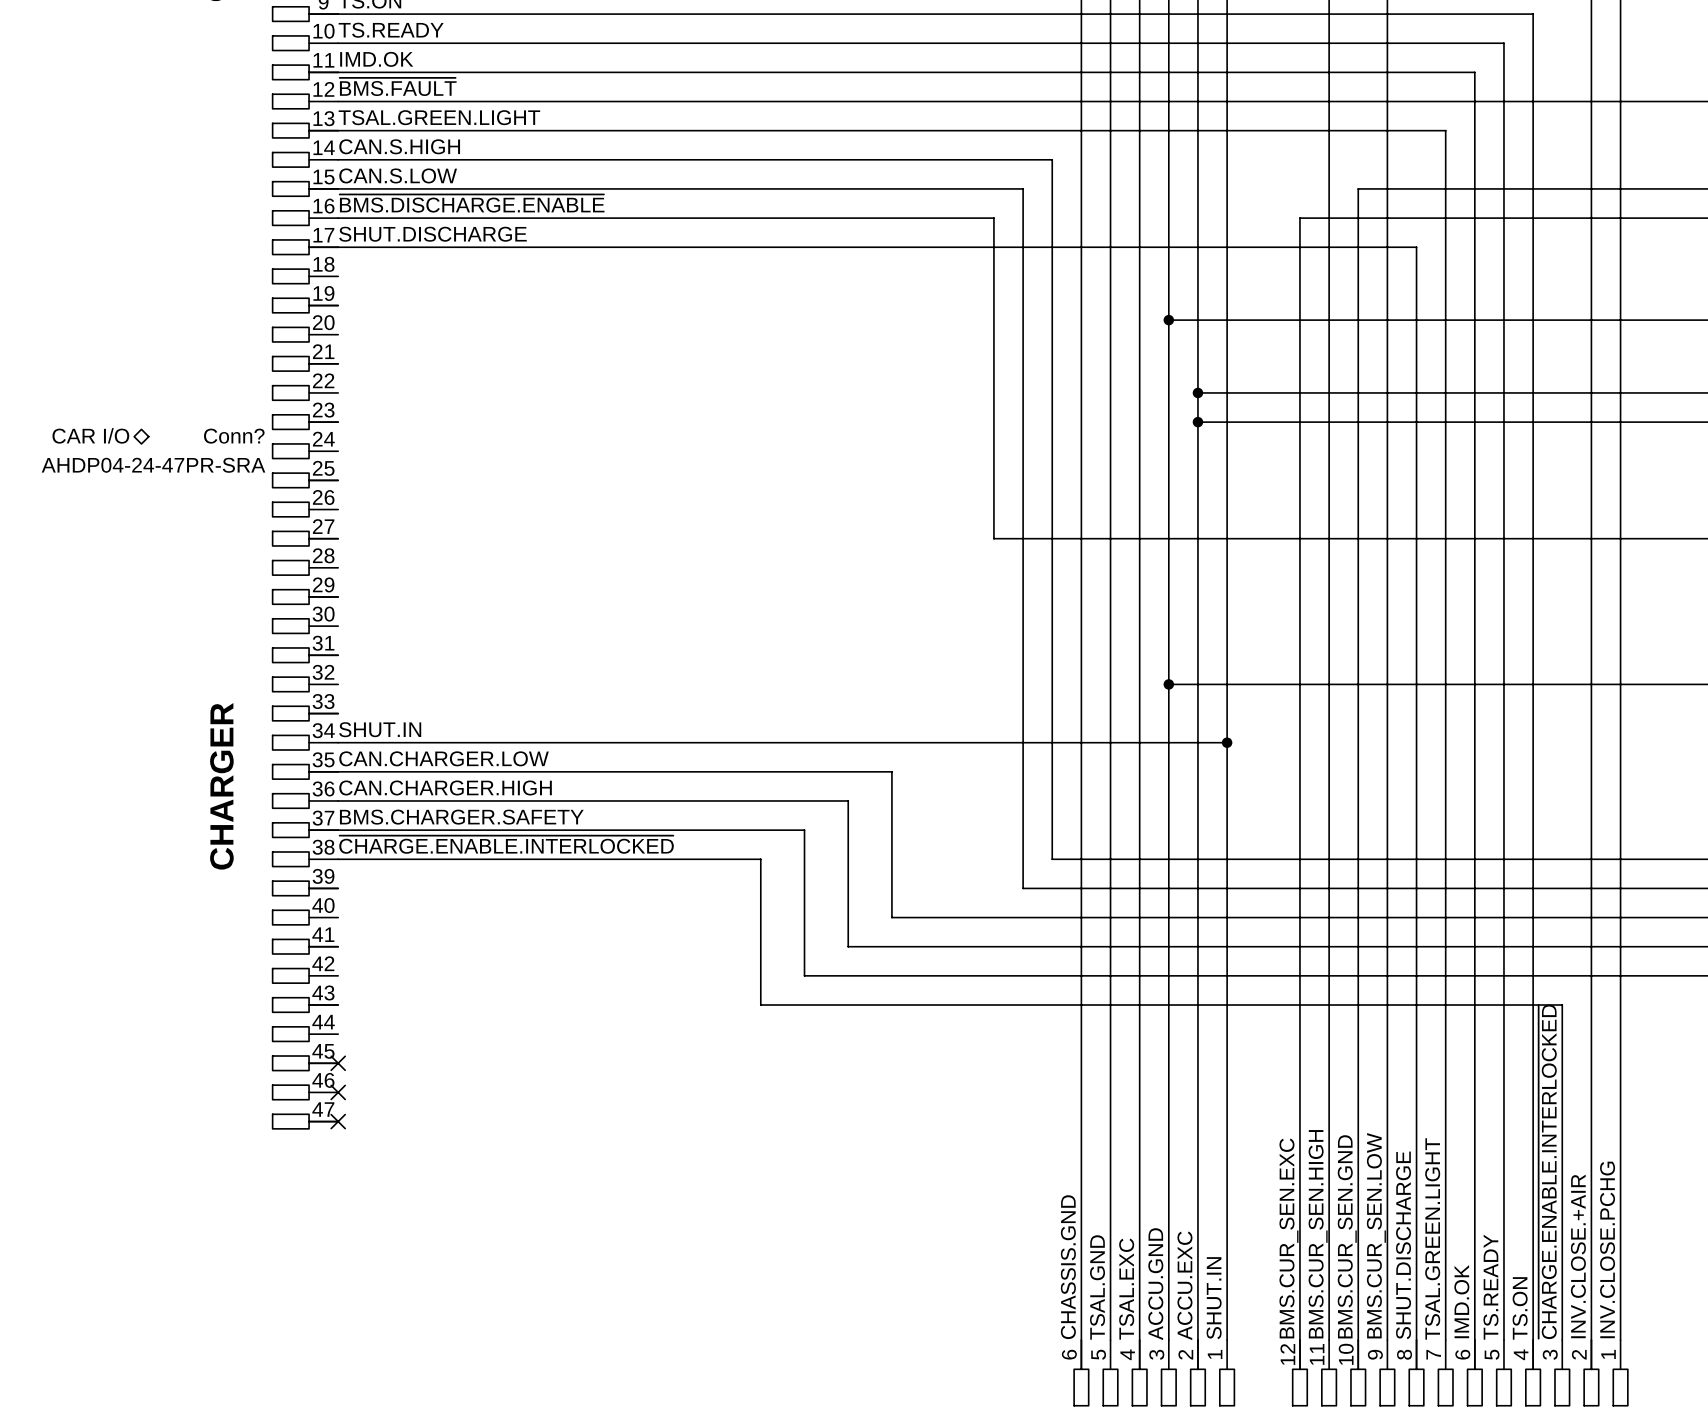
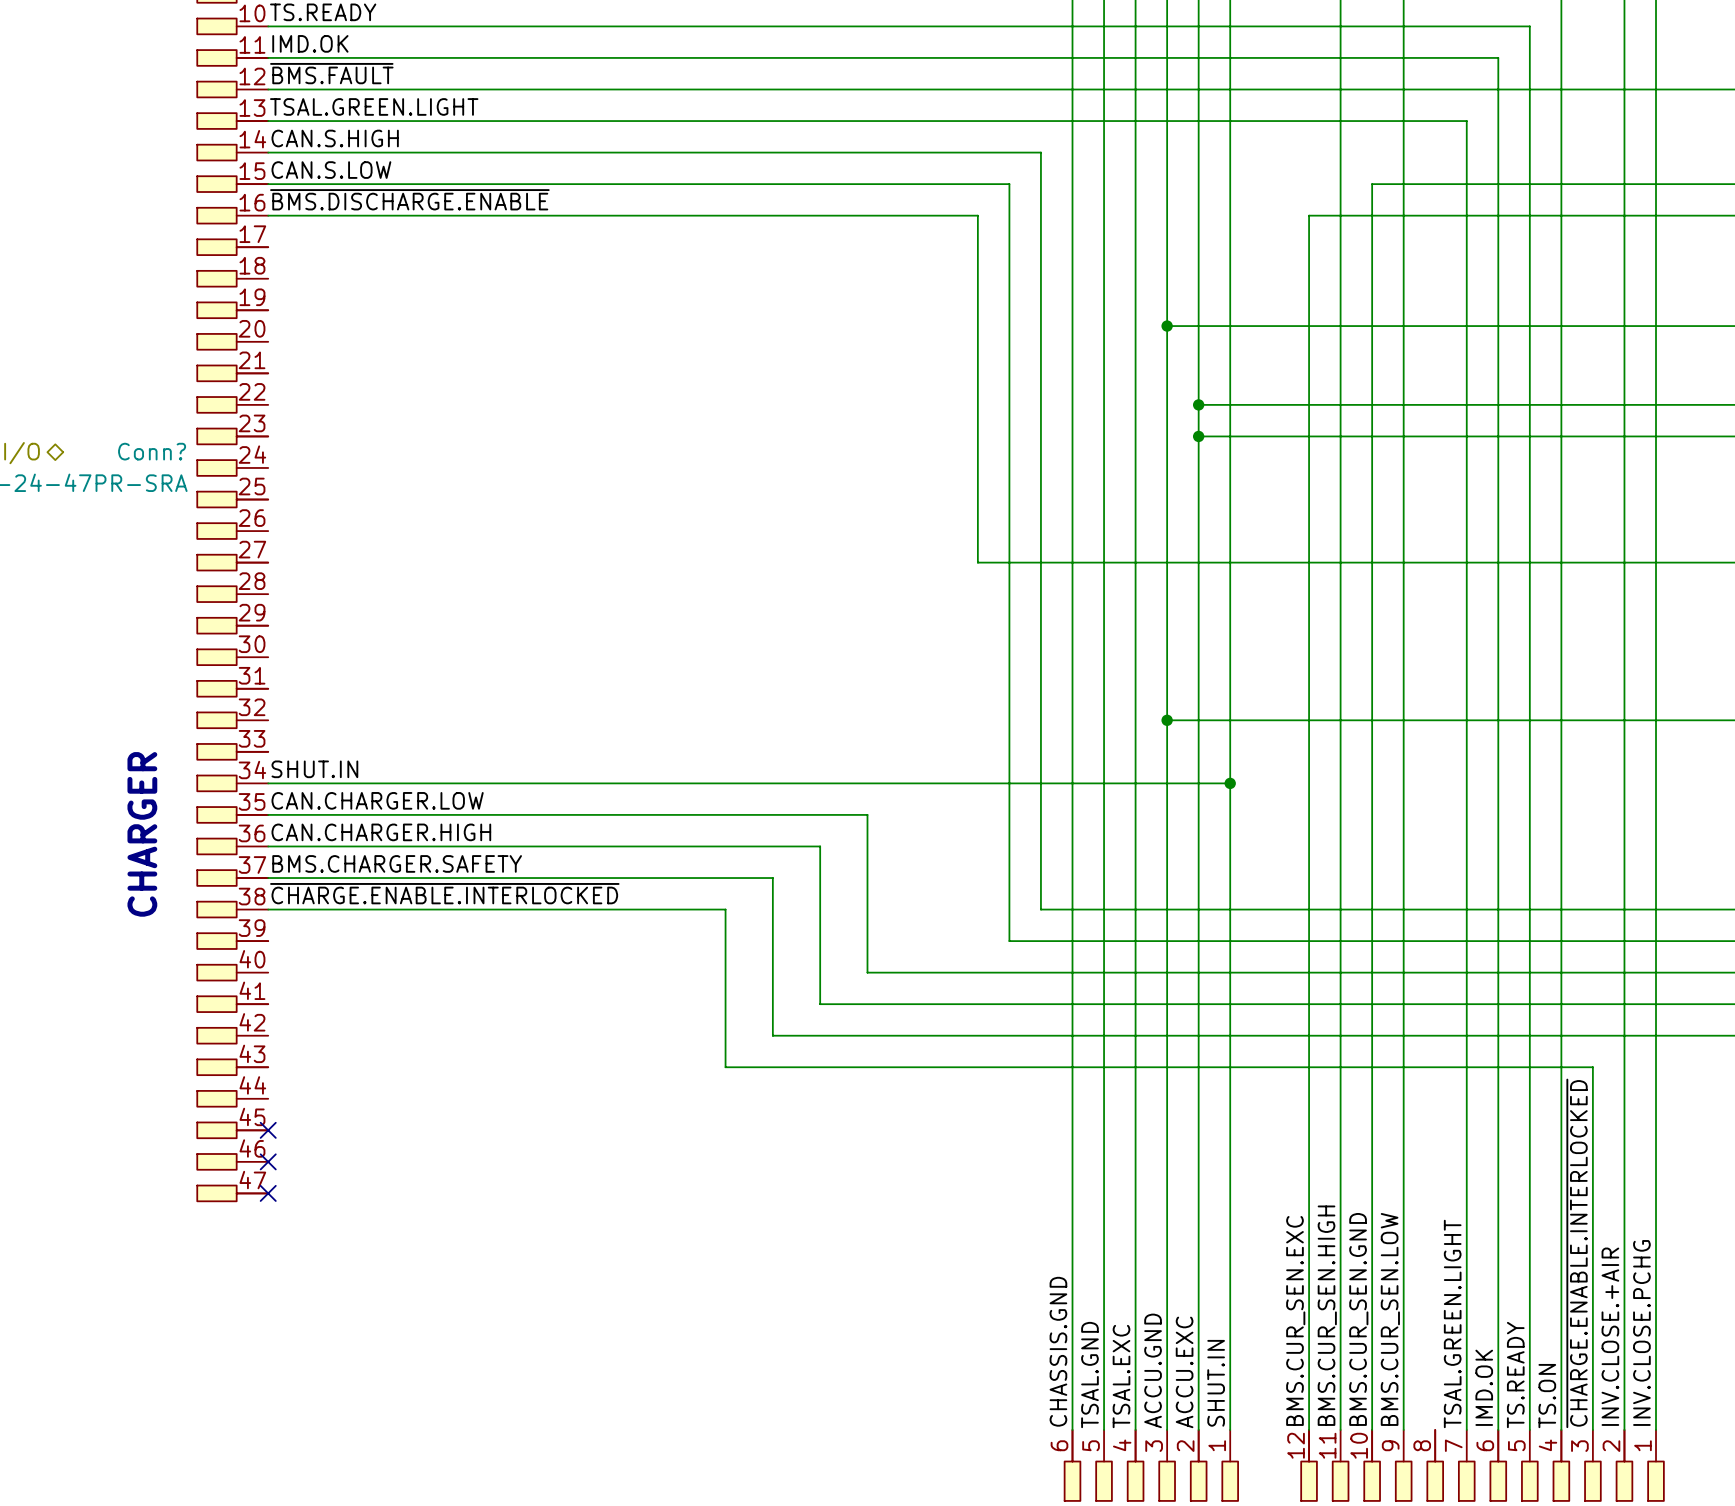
label: SHUT.DISCHARGE (432, 234) -> none
wire: (338, 247) (1416, 247) (1416, 1340) -> none
label: SHUT.DISCHARGE (1403, 1245) -> none

